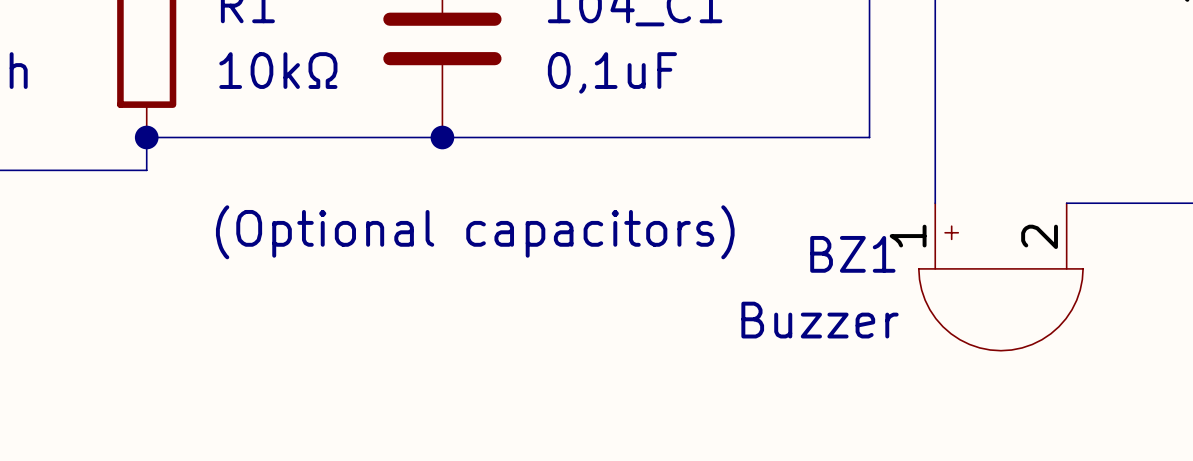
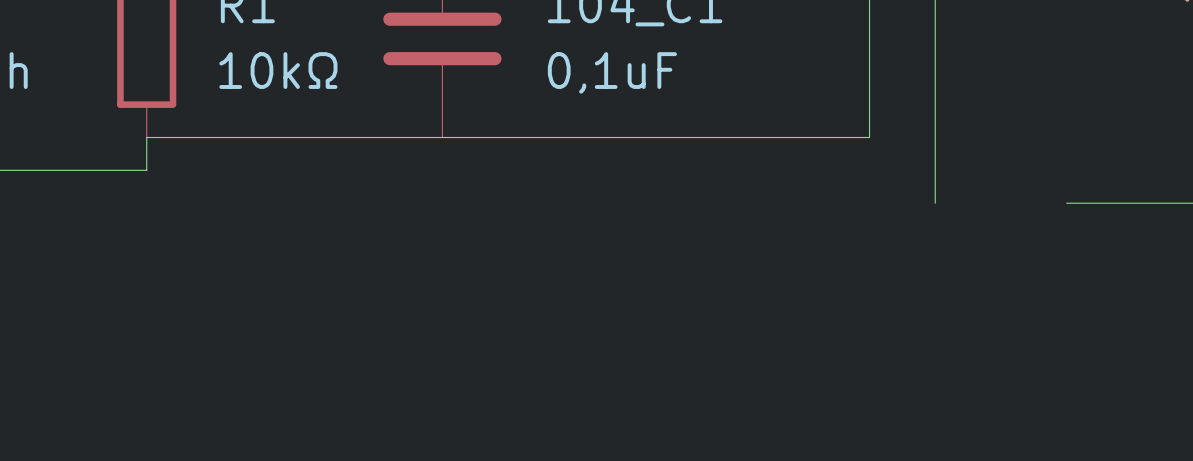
junction: (146, 137) -> none
junction: (442, 137) -> none
text: (Optional capacitors) (475, 232) -> none
BZ1: Buzzer (1000, 276) -> none

